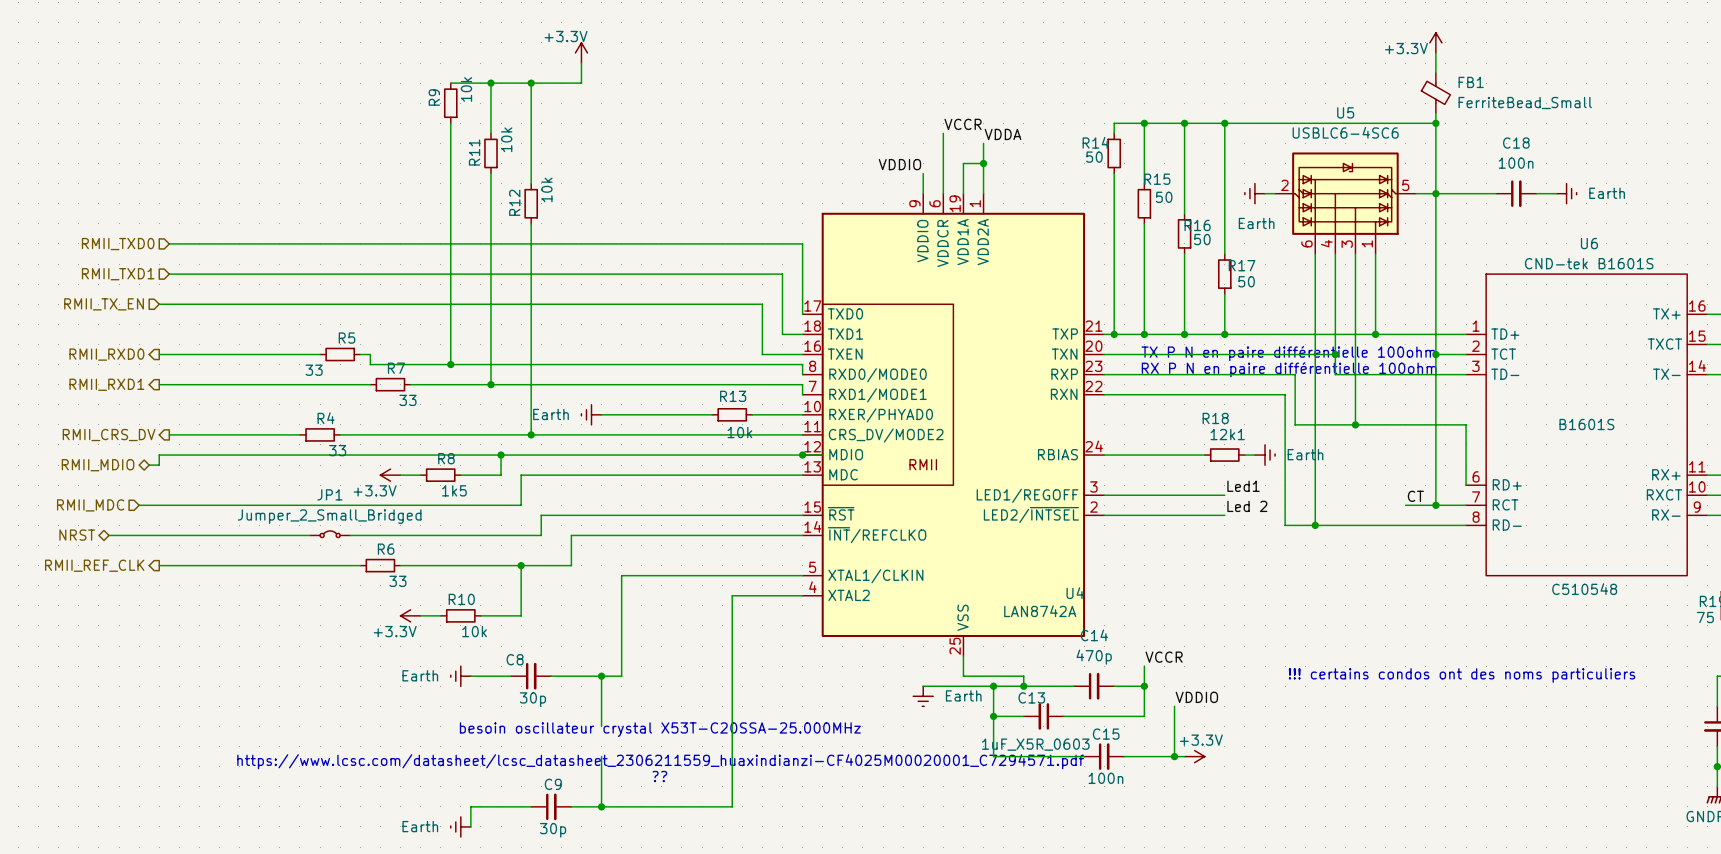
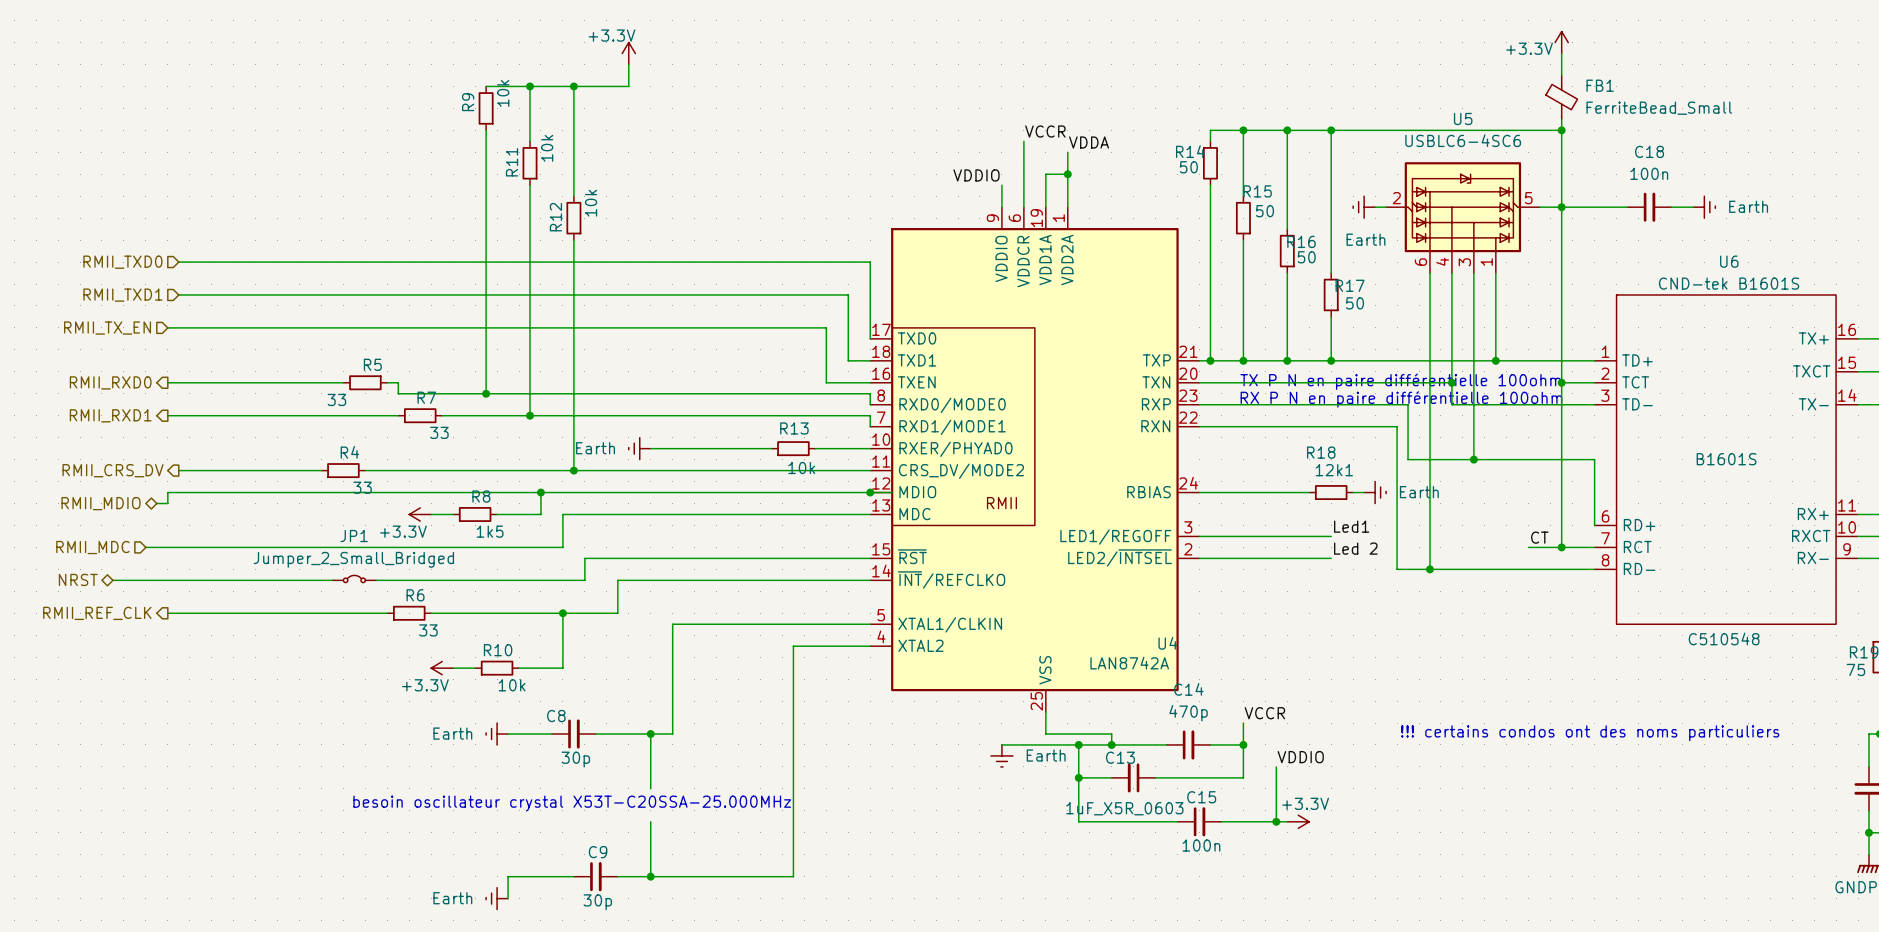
text position: besoin oscillateur crystal X53T-C20SSA-25.000MHz (660, 729) -> besoin oscillateur crystal X53T-C20SSA-25.000MHz (572, 803)
text: https://www.lcsc.com/datasheet/lcsc_datasheet_2306211559_huaxindianzi-CF4025M00020001_C7294571.pdf (660, 761) -> none
text: ?? (659, 776) -> none

